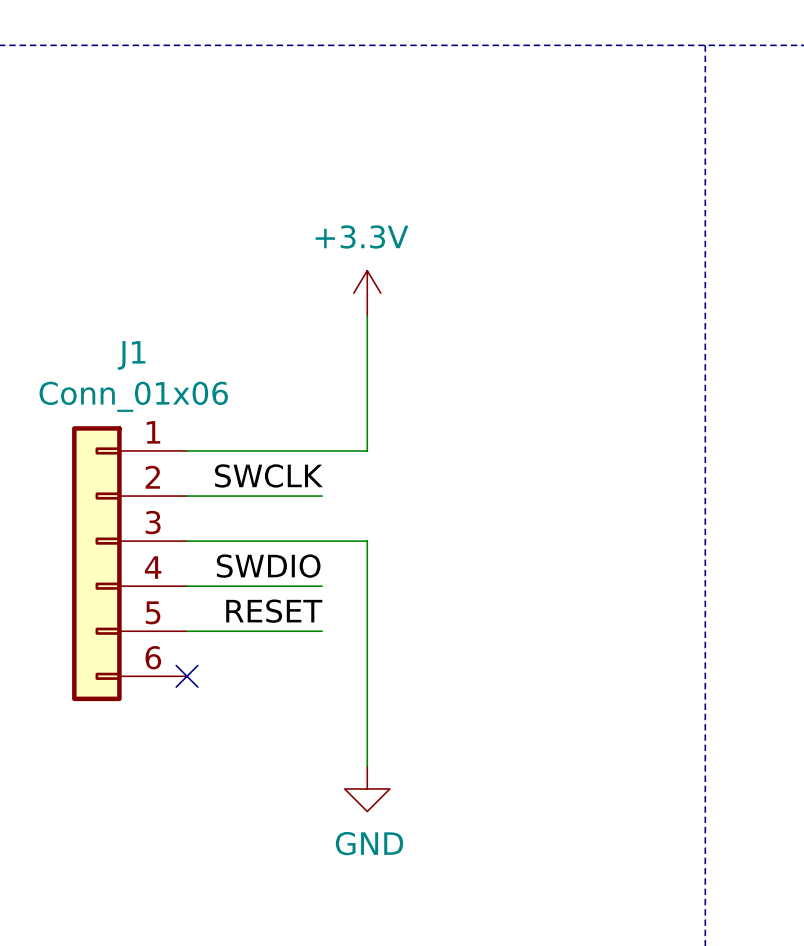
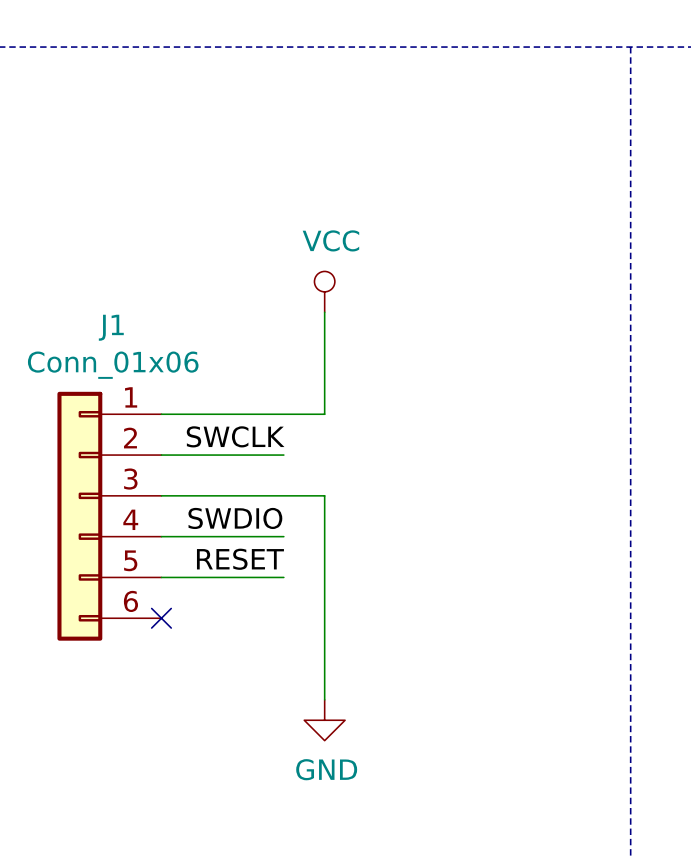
power symbol: +3.3V (367, 293) -> none
power symbol: none -> VCC (324, 291)

